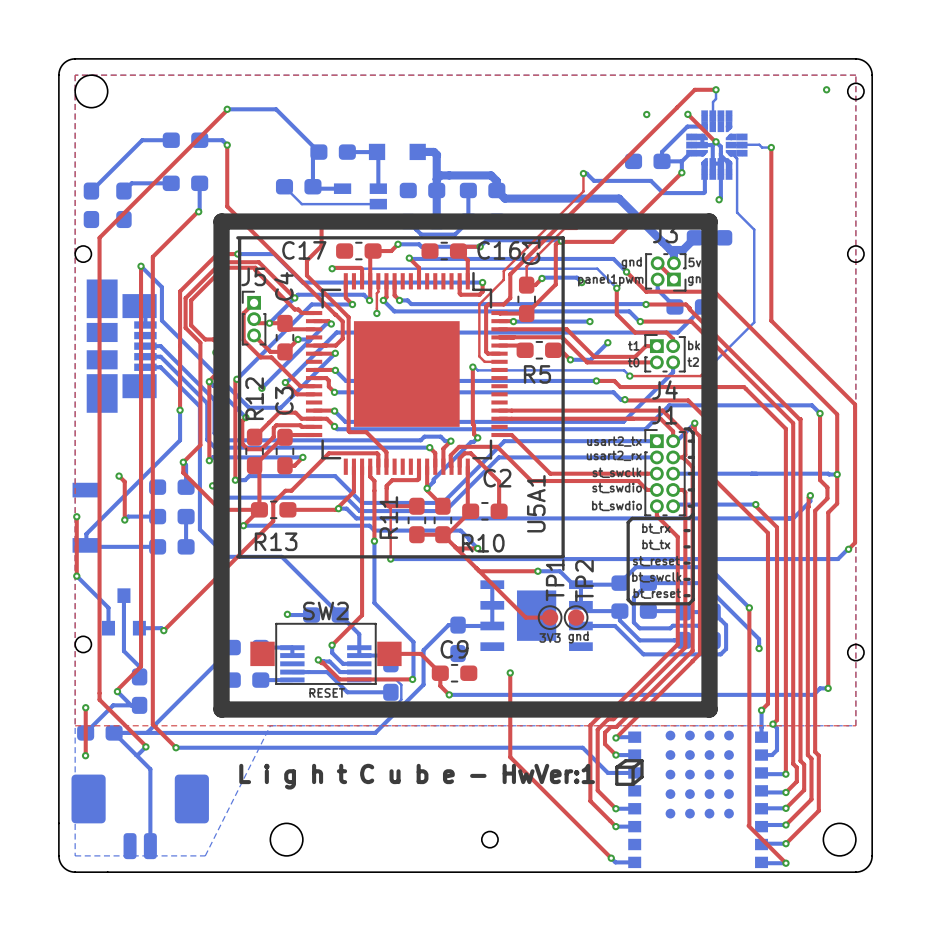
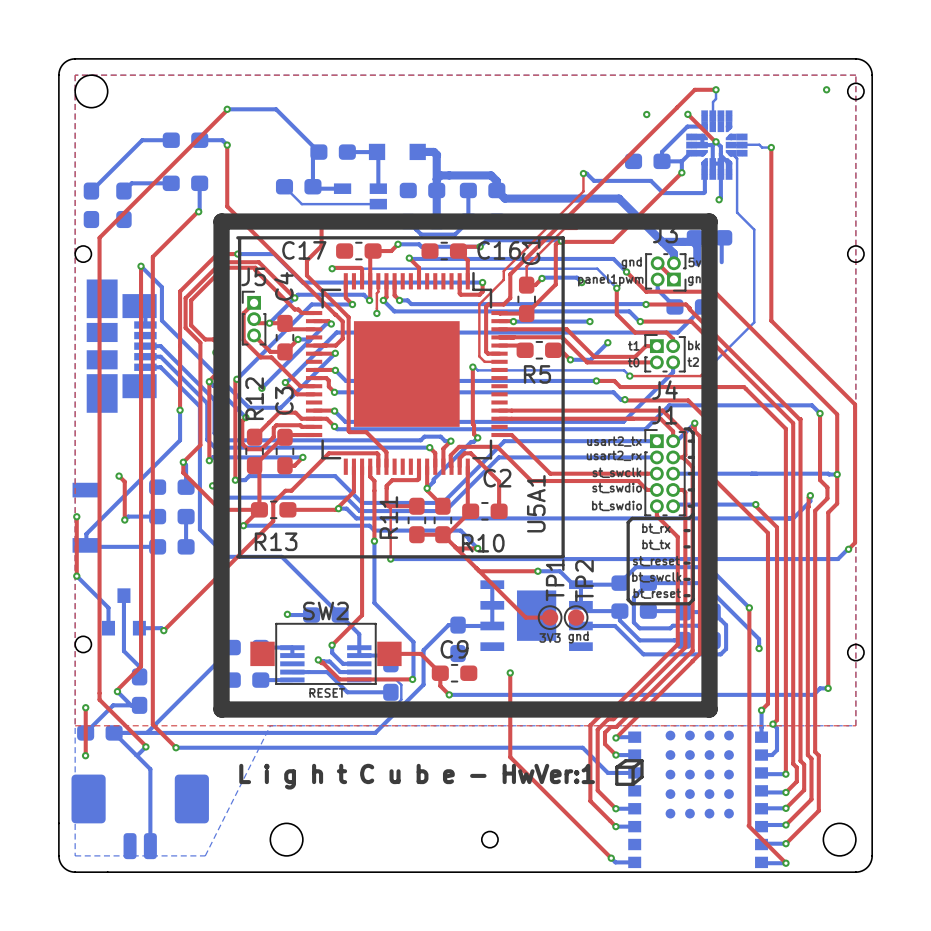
bottom track: (695, 237) (683, 250) (670, 250) -> none
bottom track: none -> (662, 241) (693, 241) (697, 245) (697, 262)
bottom track: none -> (721, 241) (721, 262)

